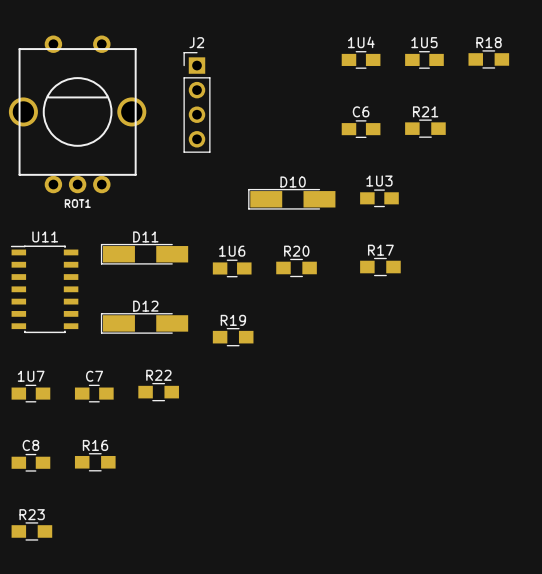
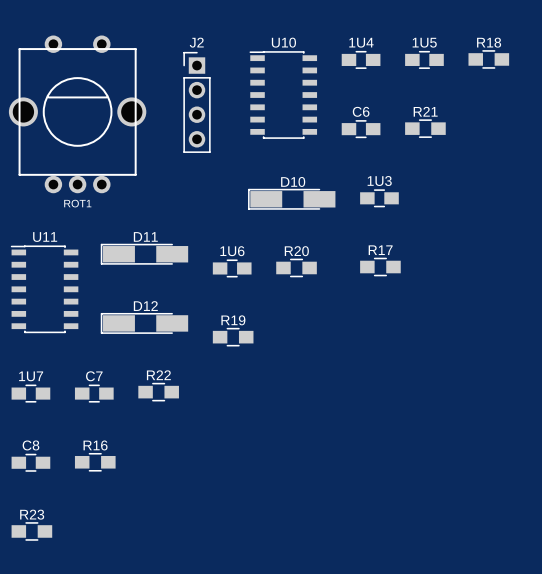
U10: none -> (283, 95)

